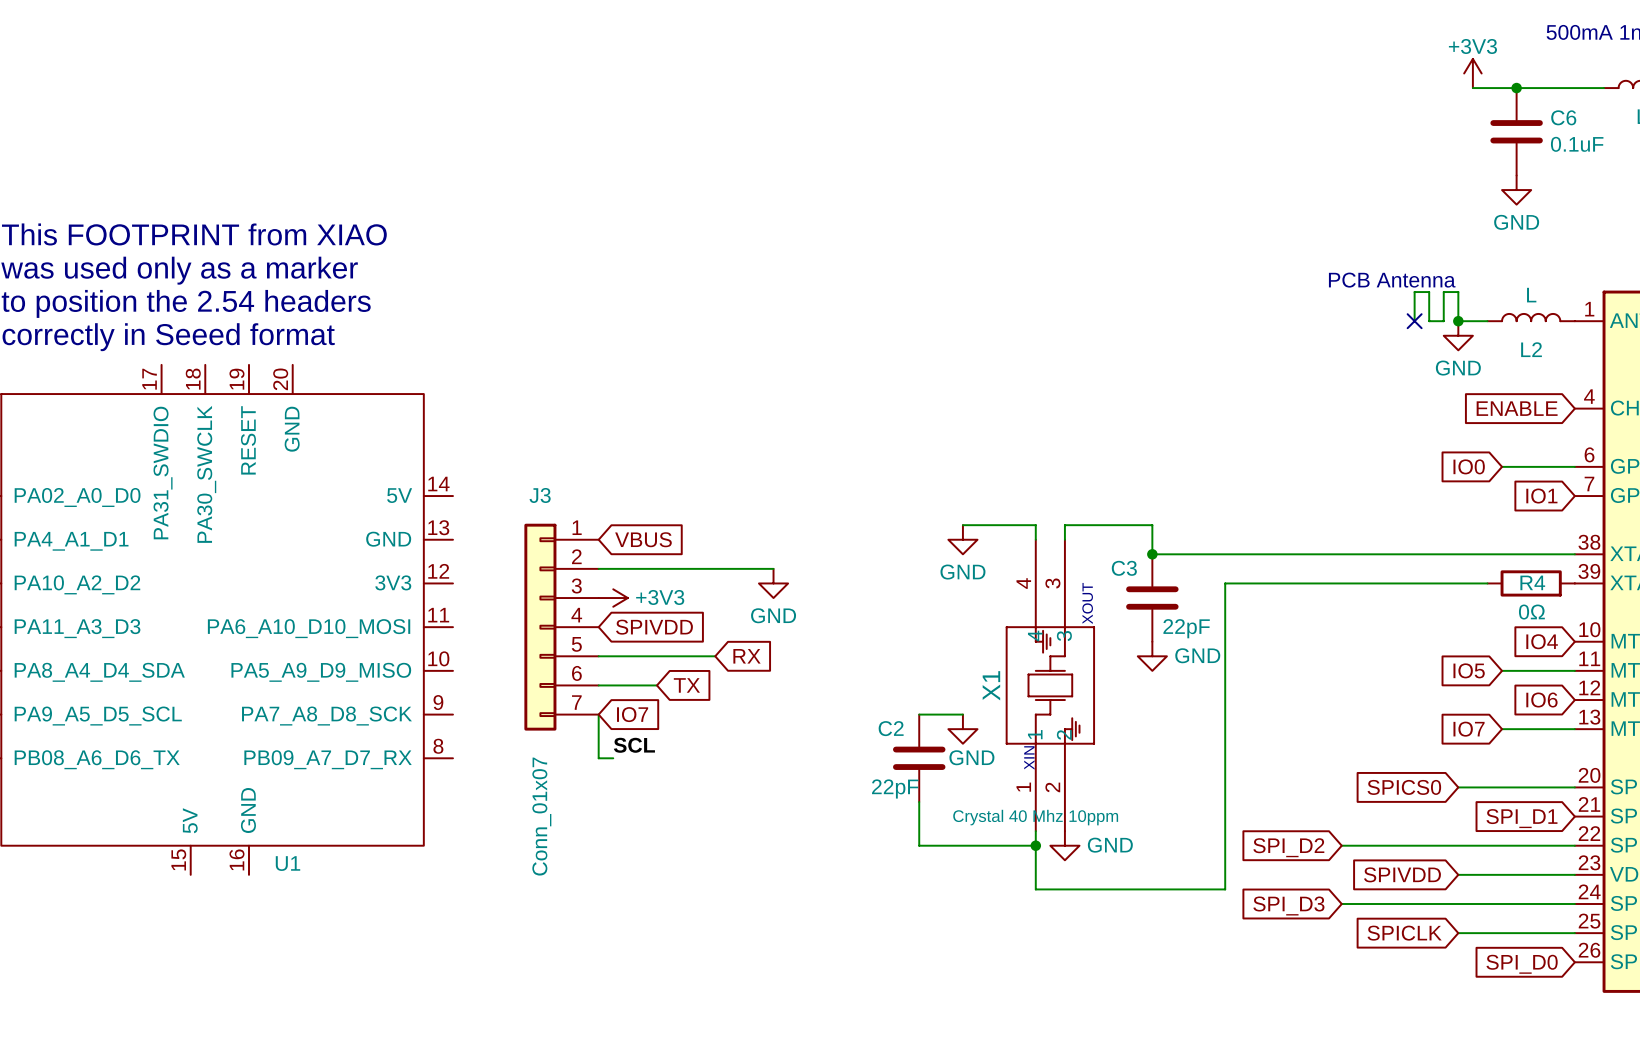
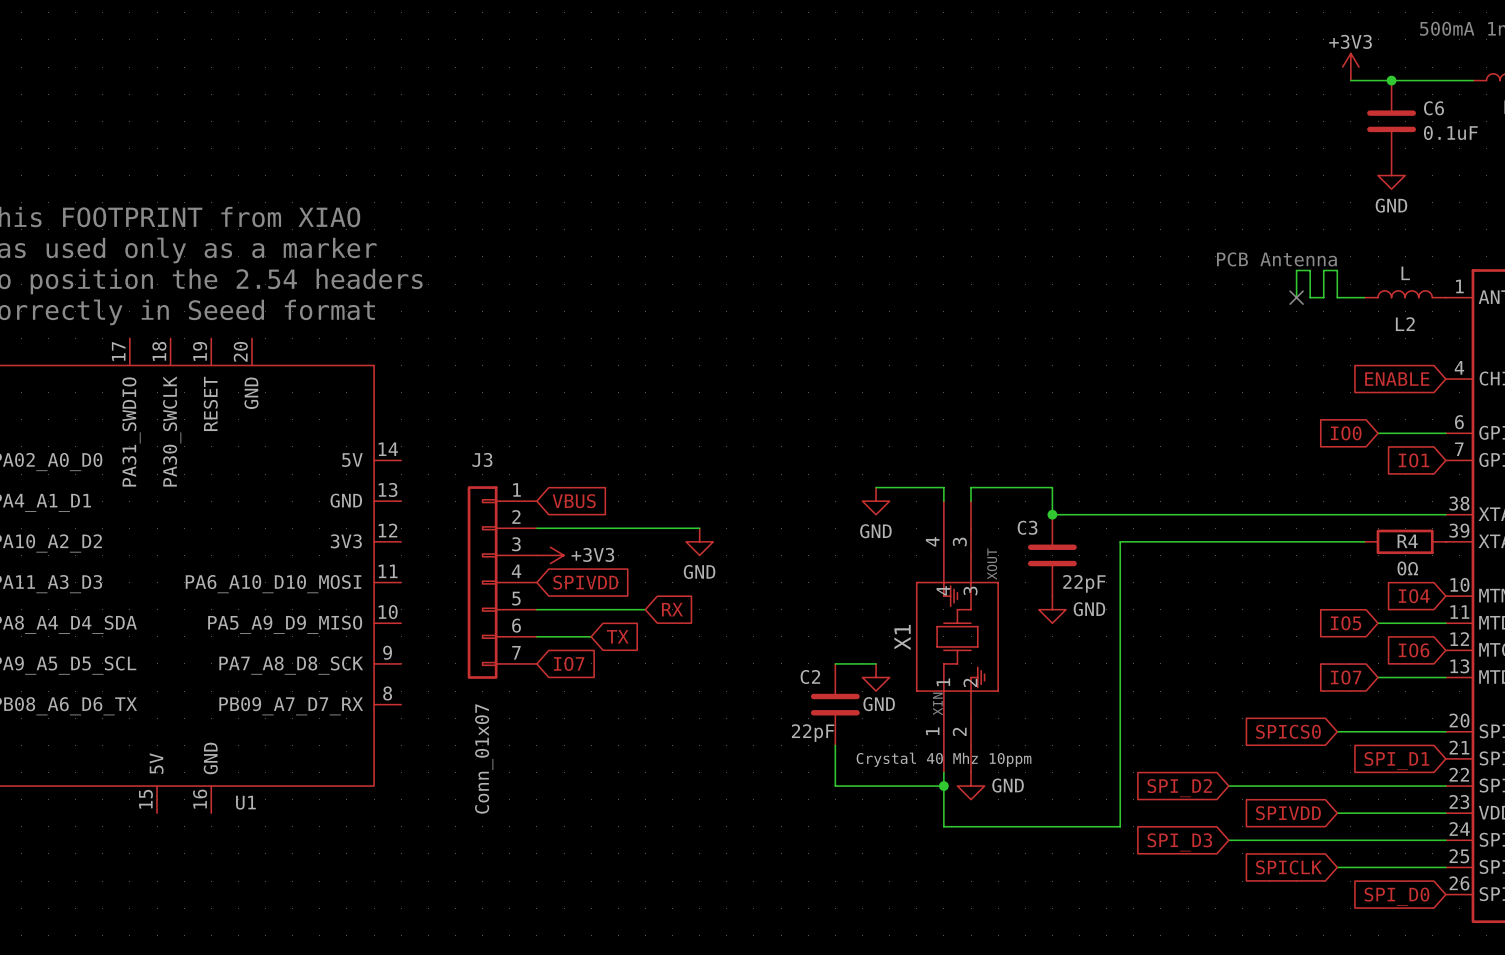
junction: (1458, 321) -> none
power symbol: GND (1458, 335) -> none
wire: (598, 714) (598, 758) (613, 758) -> none
label: SCL (634, 745) -> none

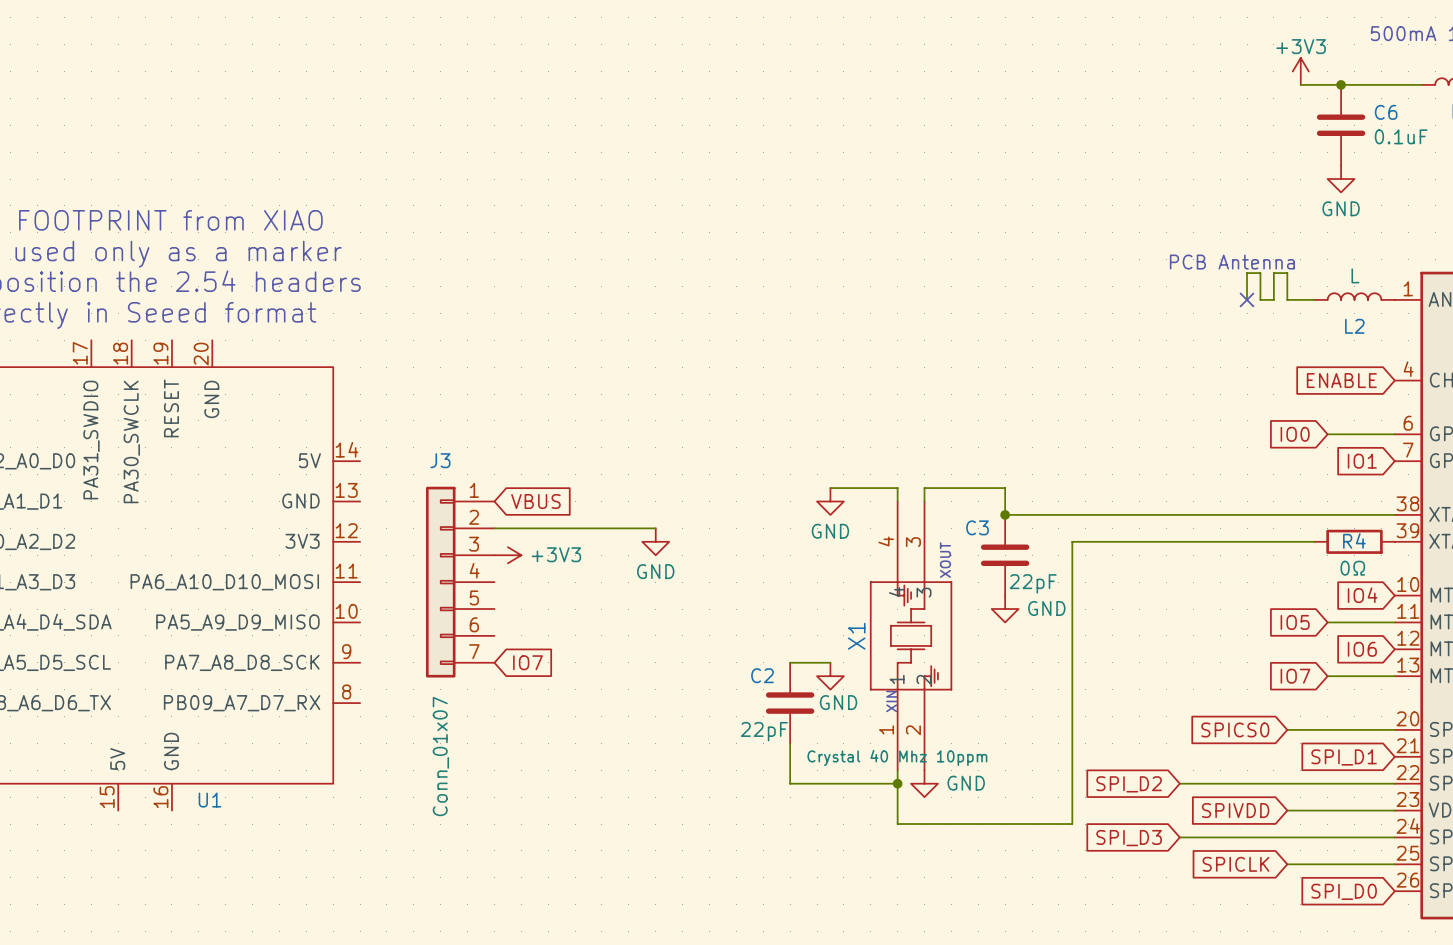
global label: SPIVDD (585, 582) -> none
wire: (536, 609) (645, 609) -> none
global label: RX (672, 609) -> none
wire: (536, 636) (591, 636) -> none
global label: TX (617, 636) -> none

